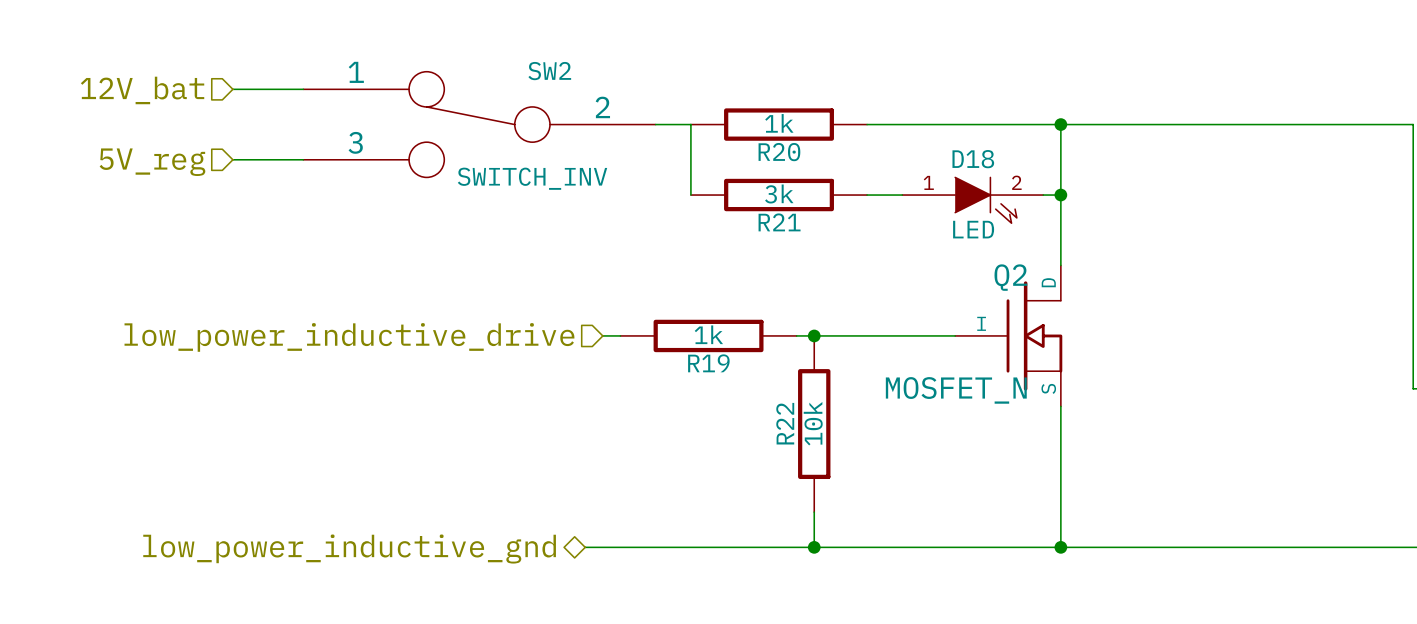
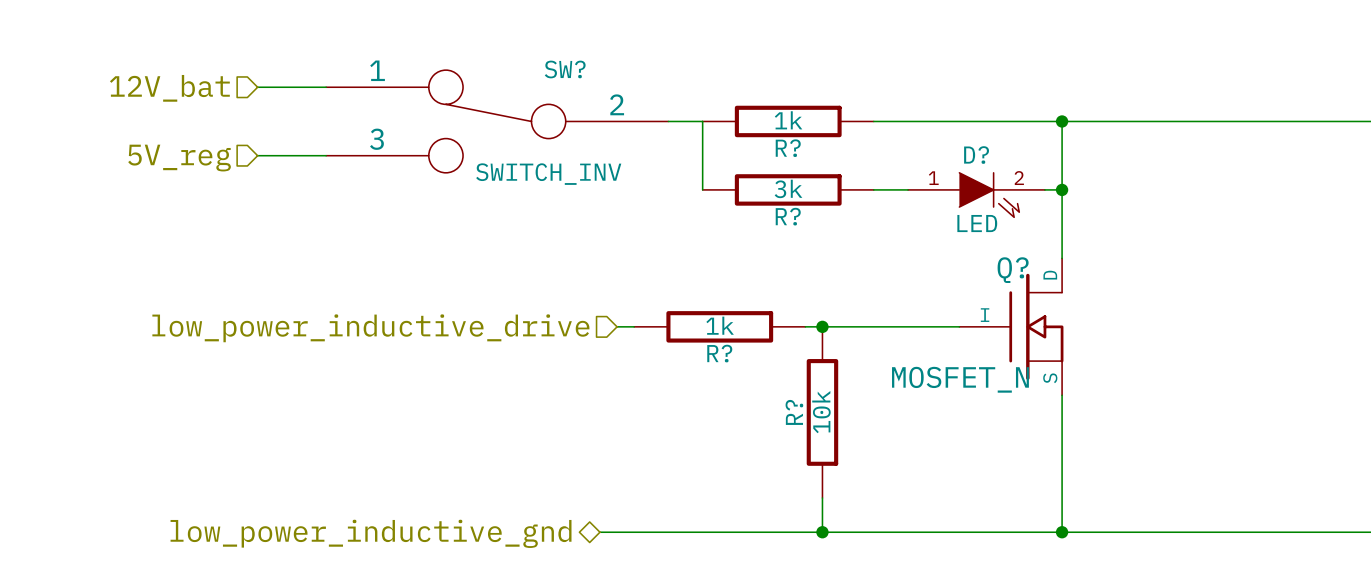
SW2 name: SW2 (549, 71) -> SW? (565, 69)
R20 name: R20 (779, 152) -> R? (788, 148)
D18 name: D18 (973, 159) -> D? (976, 155)
R21 name: R21 (779, 222) -> R? (788, 216)
Q2 name: Q2 (1010, 277) -> Q? (1013, 270)
R19 name: R19 (708, 363) -> R? (719, 353)
R22 name: R22 (785, 423) -> R? (794, 412)

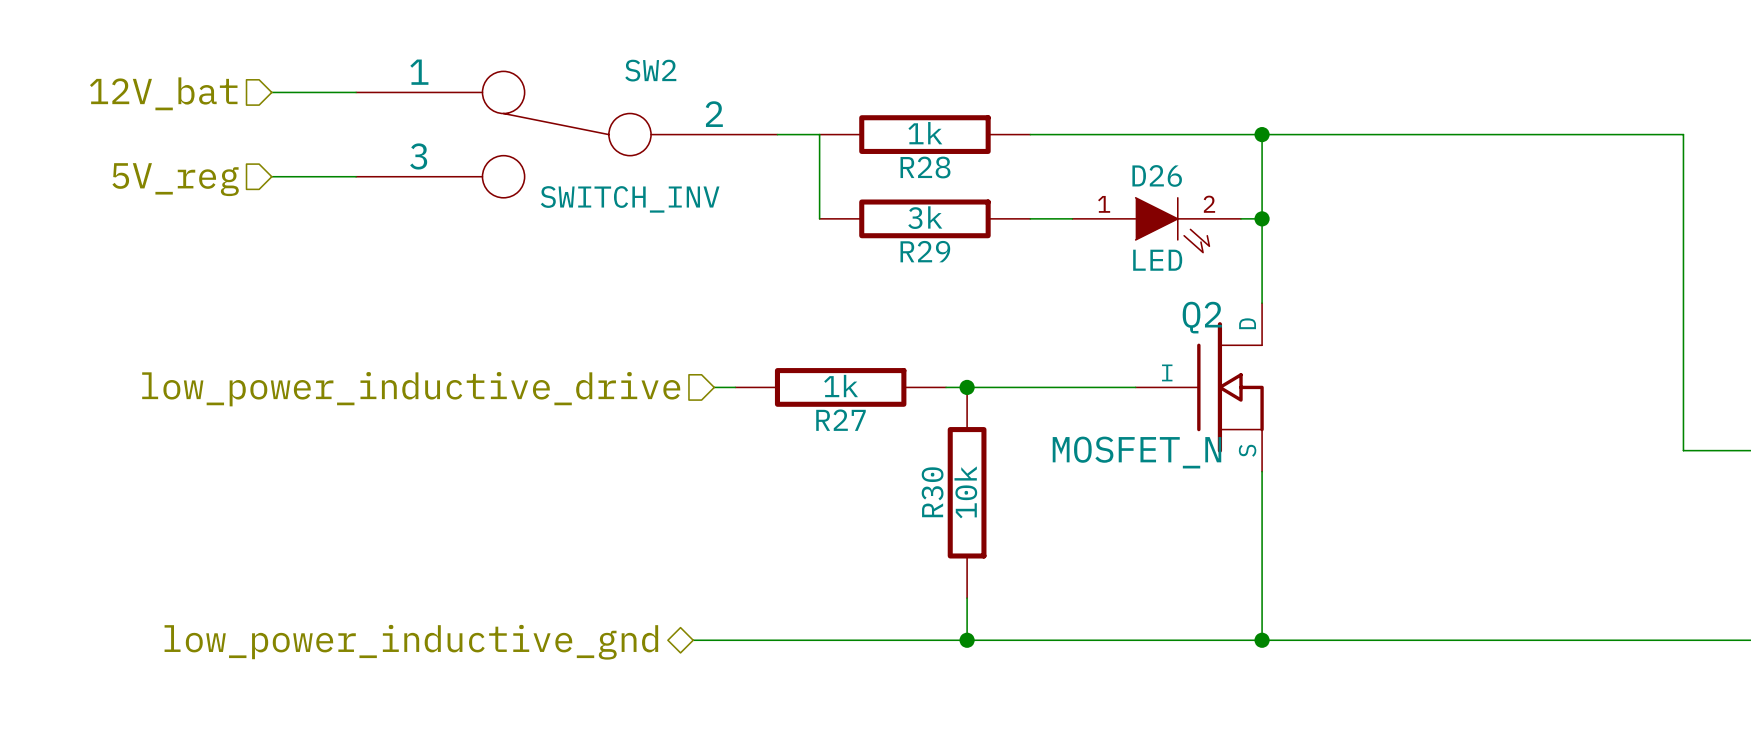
SW? name: SW? (565, 69) -> SW2 (650, 70)
R? name: R? (788, 148) -> R28 (925, 167)
D? name: D? (976, 155) -> D26 (1157, 175)
R? name: R? (788, 216) -> R29 (925, 251)
Q? name: Q? (1013, 270) -> Q2 (1202, 317)
R? name: R? (719, 353) -> R27 (840, 420)
R? name: R? (794, 412) -> R30 (932, 492)

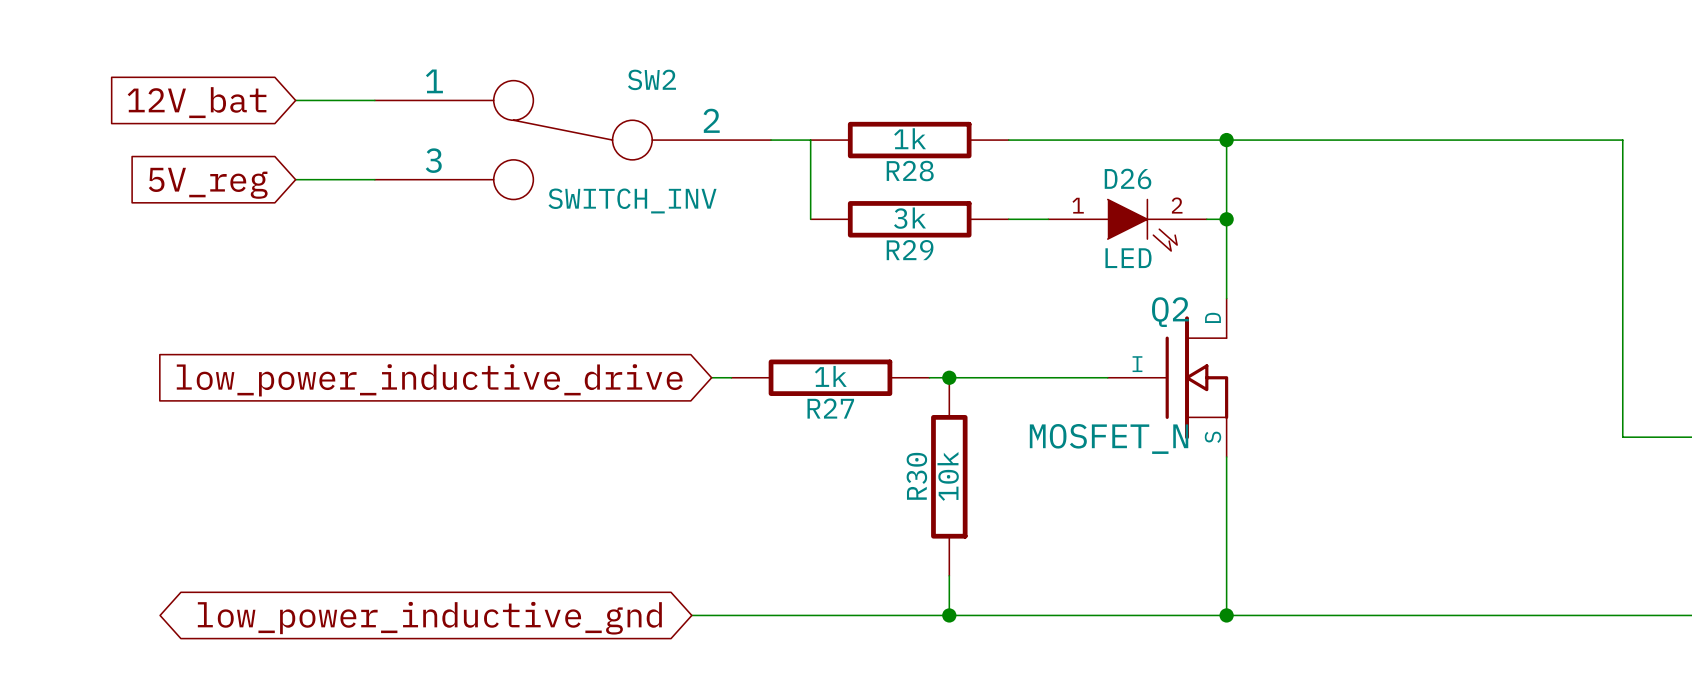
hierarchical label: 12V_bat (163, 93) -> none
global label: none -> 12V_bat (197, 102)
hierarchical label: 5V_reg (175, 179) -> none
global label: none -> 5V_reg (208, 183)
hierarchical label: low_power_inductive_drive (411, 389) -> none
global label: none -> low_power_inductive_drive (429, 380)
hierarchical label: low_power_inductive_gnd (411, 642) -> none
global label: none -> low_power_inductive_gnd (429, 618)

